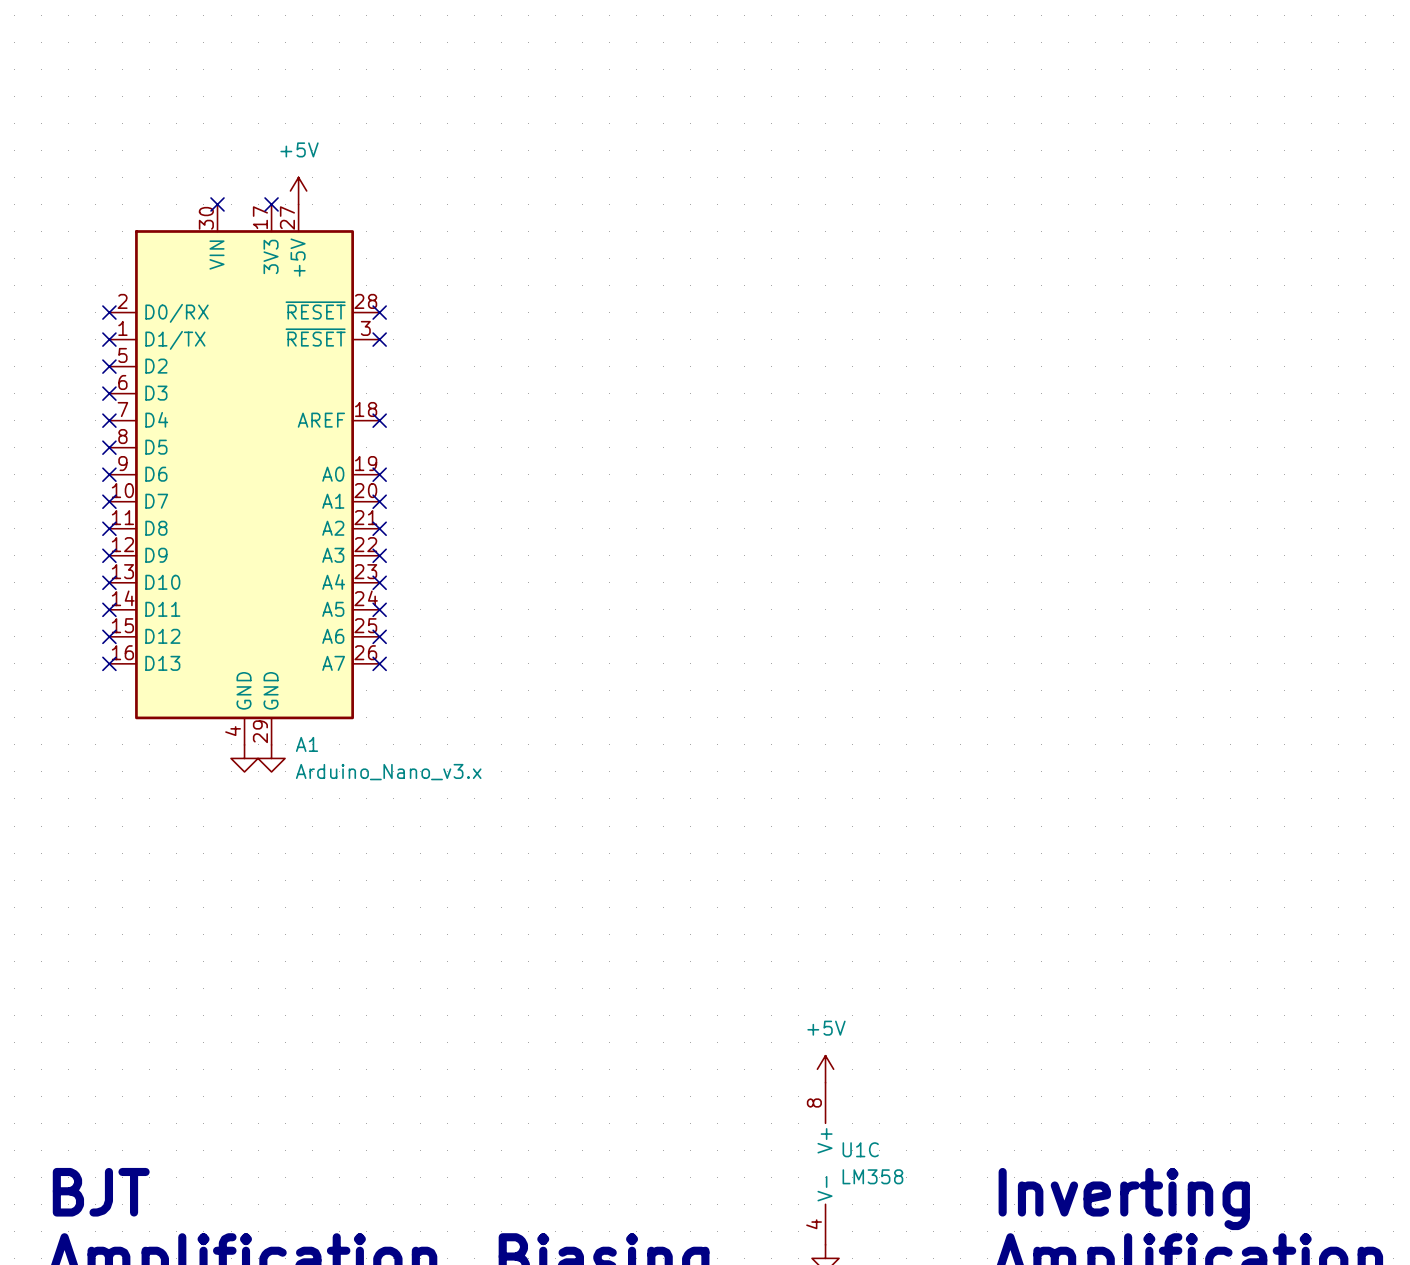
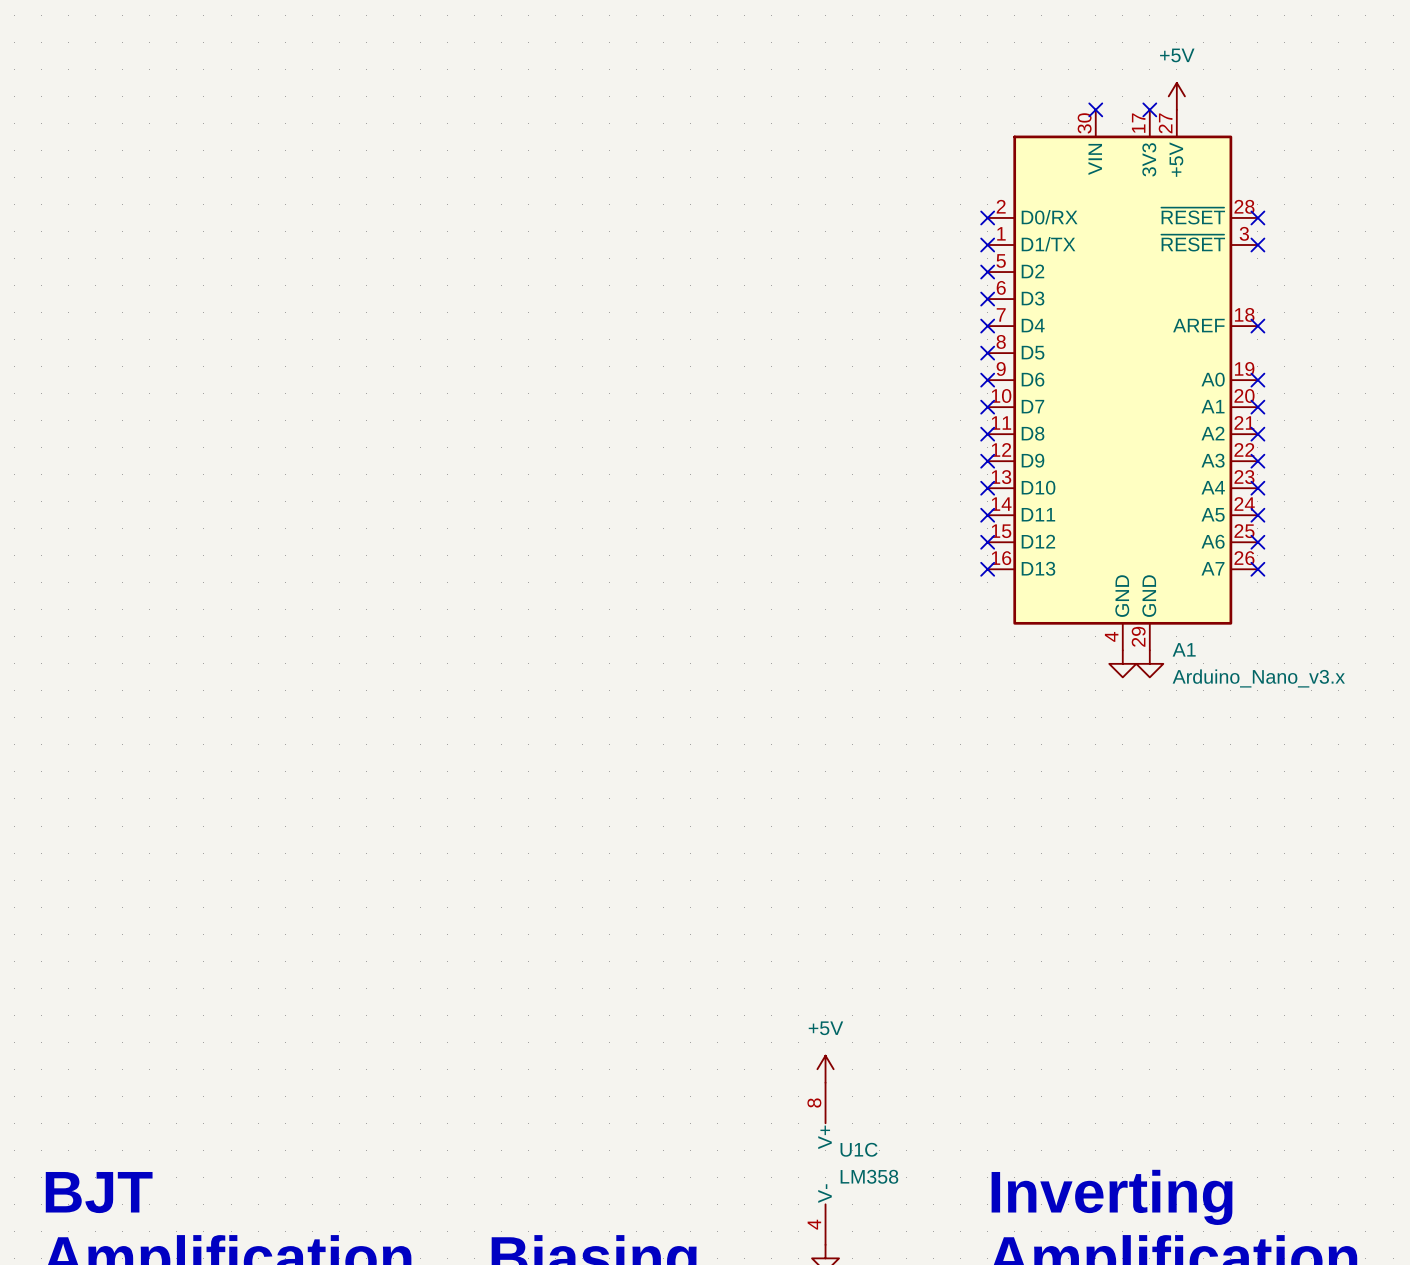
power symbol: none -> +5V (1176, 96)
no-connect mark: none -> (1095, 109)
no-connect mark: none -> (1149, 109)
power symbol: +5V (298, 190) -> none
no-connect mark: (217, 204) -> none
no-connect mark: (271, 204) -> none
no-connect mark: none -> (987, 217)
no-connect mark: none -> (1257, 217)
no-connect mark: none -> (987, 245)
no-connect mark: none -> (1257, 245)
no-connect mark: none -> (987, 272)
no-connect mark: none -> (987, 299)
no-connect mark: (109, 312) -> none
no-connect mark: (379, 312) -> none
no-connect mark: none -> (987, 326)
no-connect mark: none -> (1257, 326)
no-connect mark: (109, 339) -> none
no-connect mark: (379, 339) -> none
no-connect mark: none -> (987, 353)
no-connect mark: (109, 366) -> none
no-connect mark: none -> (987, 380)
no-connect mark: none -> (1257, 380)
no-connect mark: (109, 393) -> none
no-connect mark: none -> (987, 407)
no-connect mark: none -> (1257, 407)
no-connect mark: (109, 420) -> none
no-connect mark: (379, 420) -> none
no-connect mark: none -> (987, 434)
no-connect mark: none -> (1257, 434)
no-connect mark: (109, 447) -> none
no-connect mark: none -> (987, 461)
no-connect mark: none -> (1257, 461)
no-connect mark: (109, 474) -> none
A1 position: (244, 474) -> (1122, 380)
no-connect mark: (379, 474) -> none
no-connect mark: none -> (987, 488)
no-connect mark: none -> (1257, 488)
no-connect mark: (109, 501) -> none
no-connect mark: (379, 501) -> none
no-connect mark: none -> (987, 515)
no-connect mark: none -> (1257, 515)
no-connect mark: (109, 528) -> none
no-connect mark: (379, 528) -> none
no-connect mark: none -> (987, 542)
no-connect mark: none -> (1257, 542)
no-connect mark: (109, 555) -> none
no-connect mark: (379, 555) -> none
no-connect mark: none -> (987, 569)
no-connect mark: none -> (1257, 569)
no-connect mark: (109, 582) -> none
no-connect mark: (379, 582) -> none
no-connect mark: (109, 609) -> none
no-connect mark: (379, 609) -> none
no-connect mark: (109, 636) -> none
no-connect mark: (379, 636) -> none
no-connect mark: (109, 663) -> none
no-connect mark: (379, 663) -> none
power symbol: none -> (1122, 663)
power symbol: none -> (1149, 663)
power symbol: (244, 758) -> none
power symbol: (271, 758) -> none

